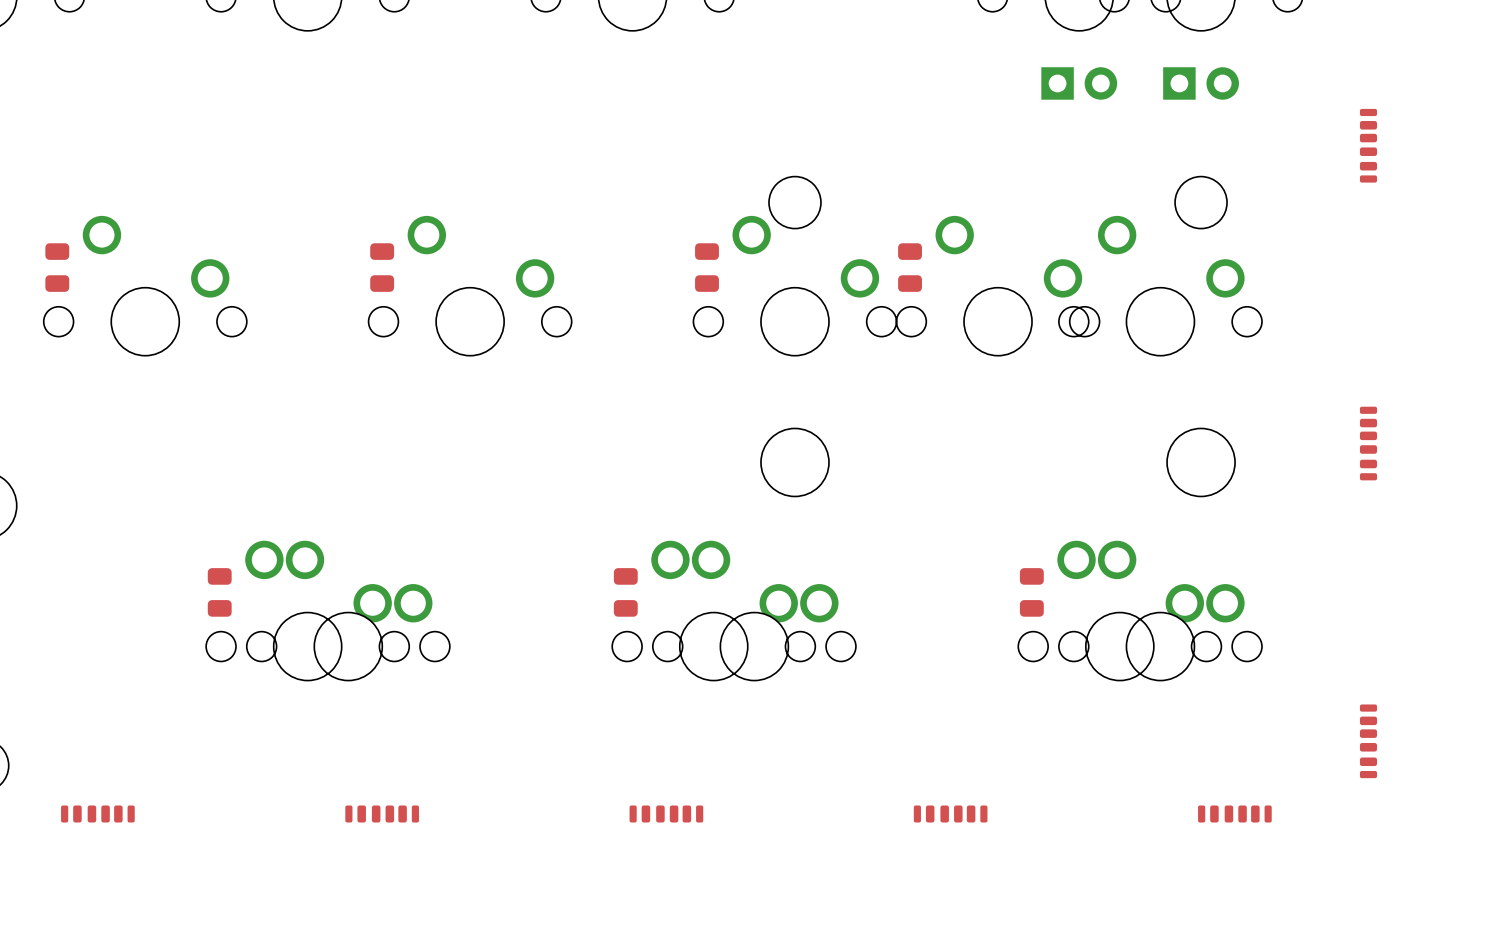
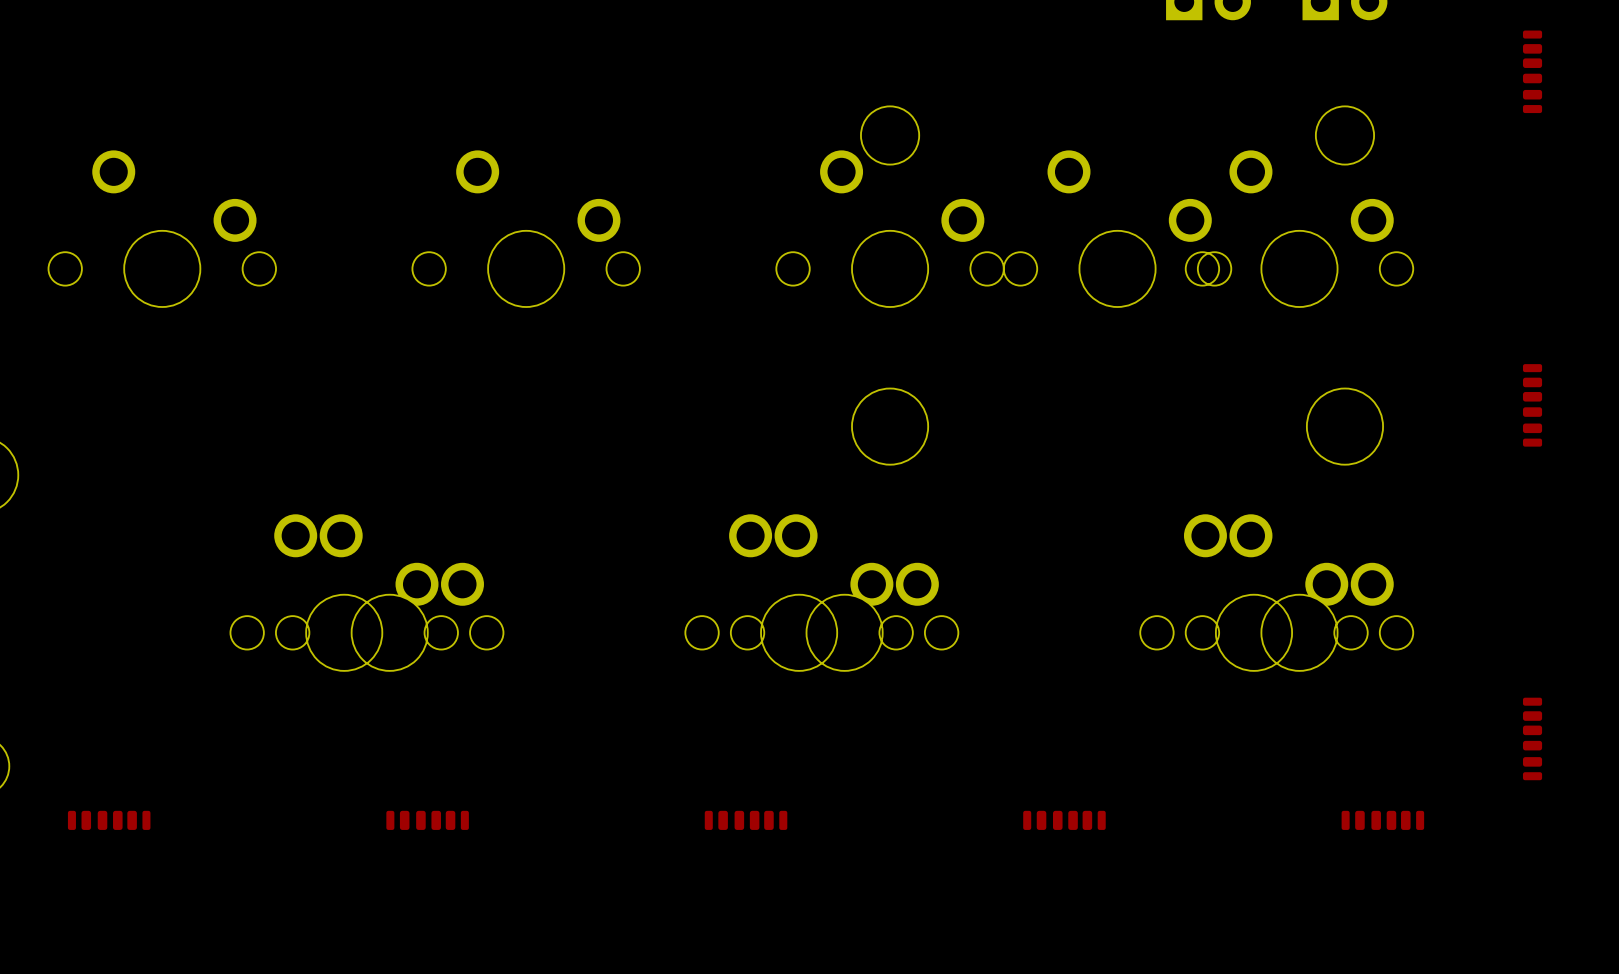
part: (57, 267) -> none
part: (382, 267) -> none
part: (707, 267) -> none
part: (910, 267) -> none
part: (219, 592) -> none
part: (625, 592) -> none
part: (1031, 592) -> none

